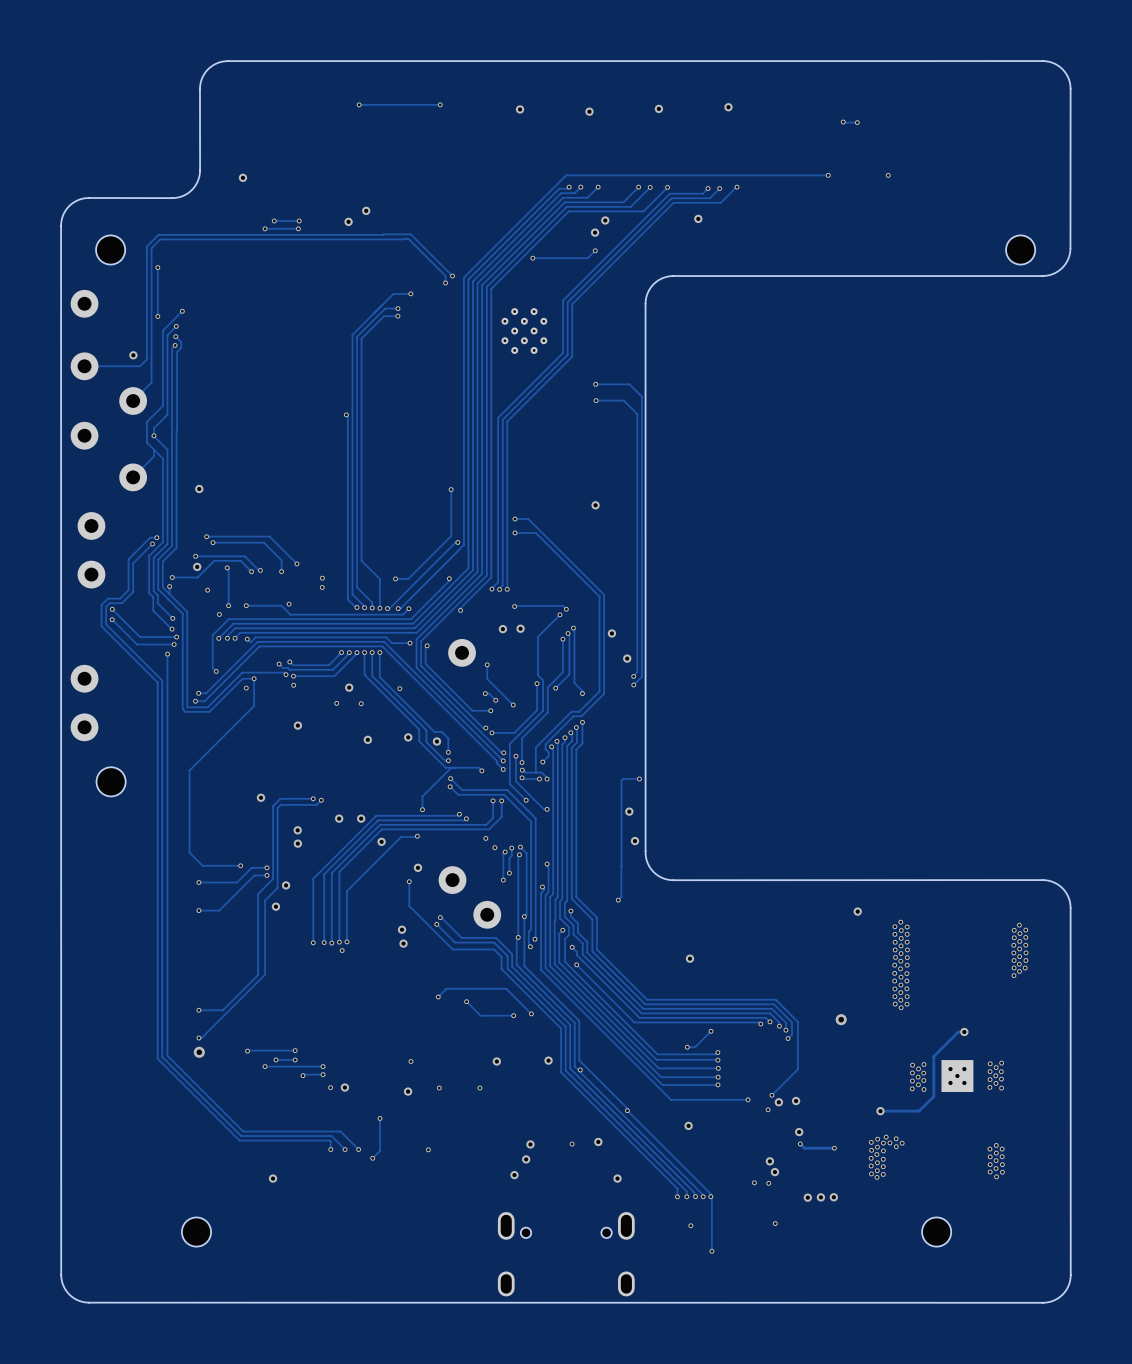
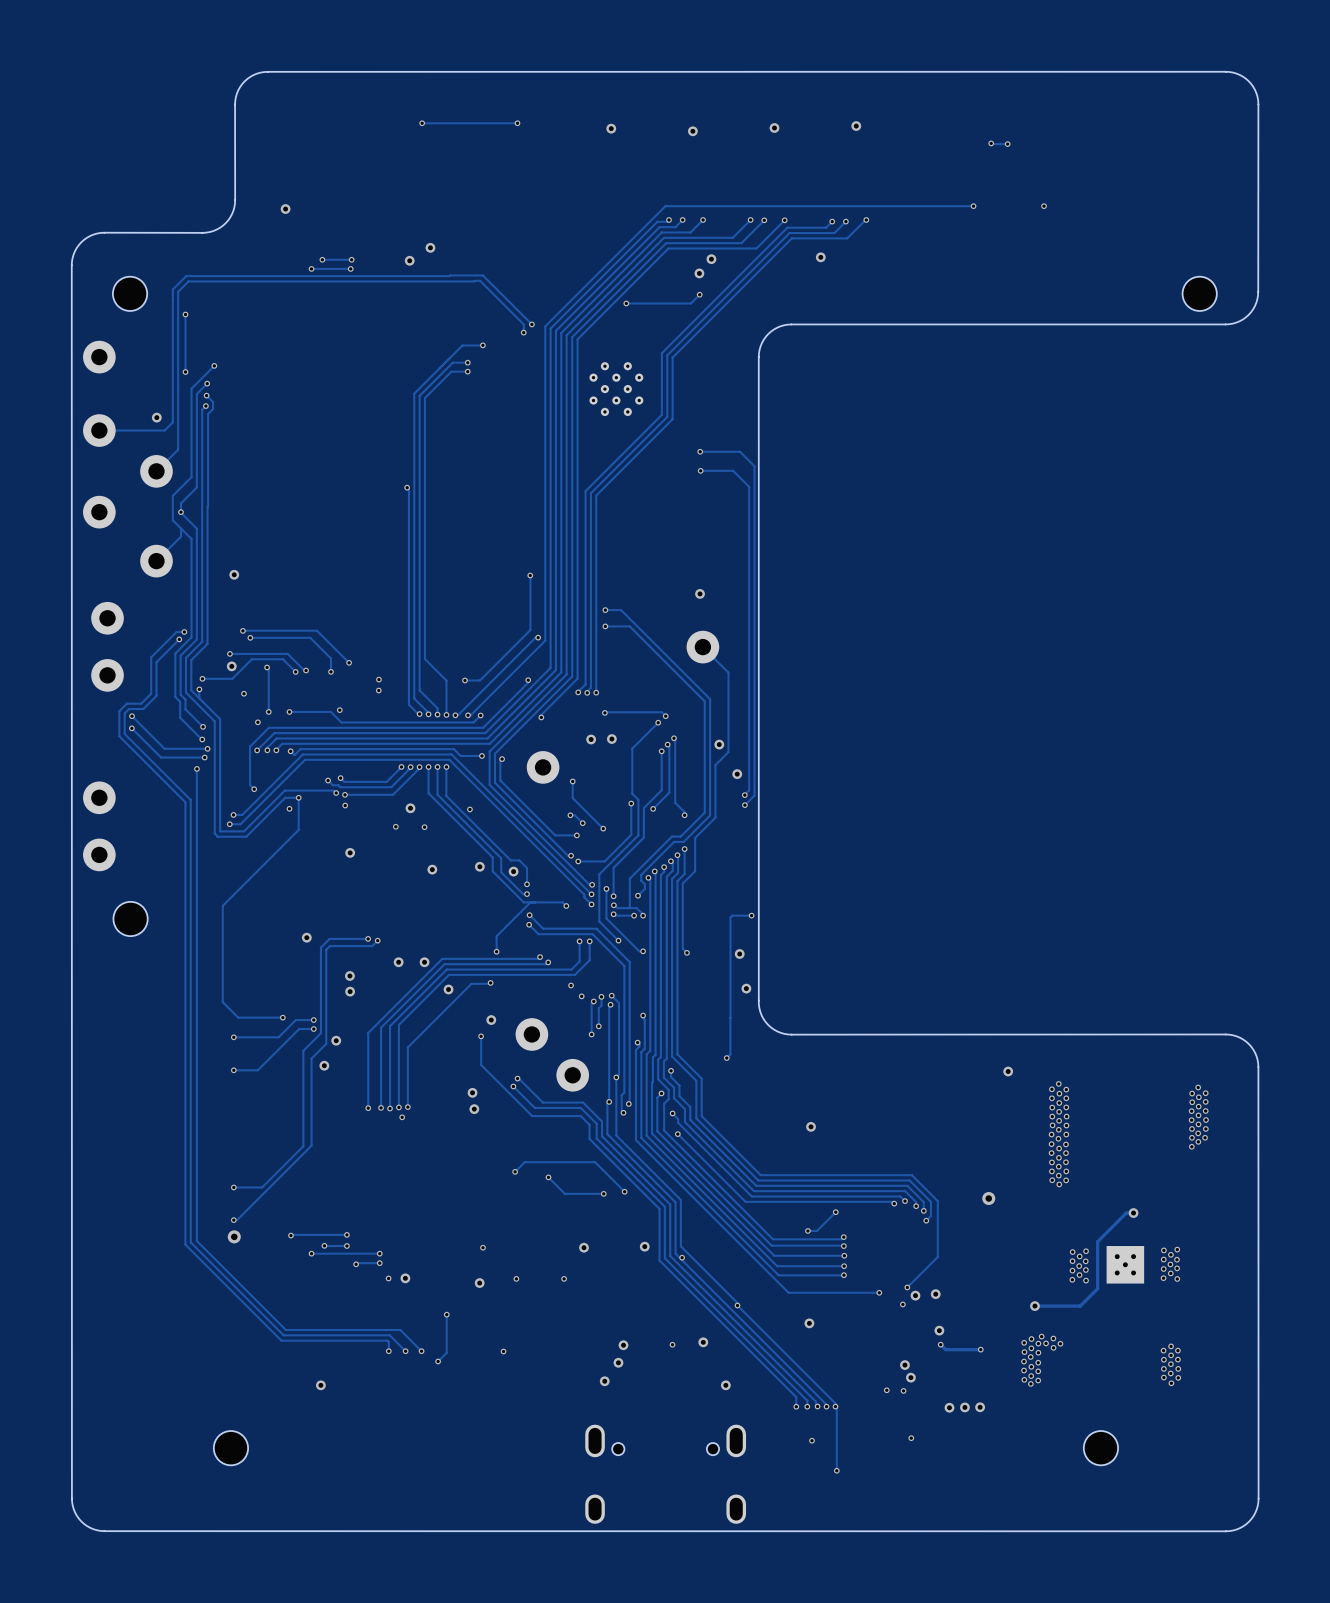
track: none -> (702, 647) (728, 672) (728, 752) (715, 765) (715, 817) (695, 837) (695, 871) (682, 883) (682, 948) (686, 952)
part: none -> (702, 647)
via: none -> (686, 952)

